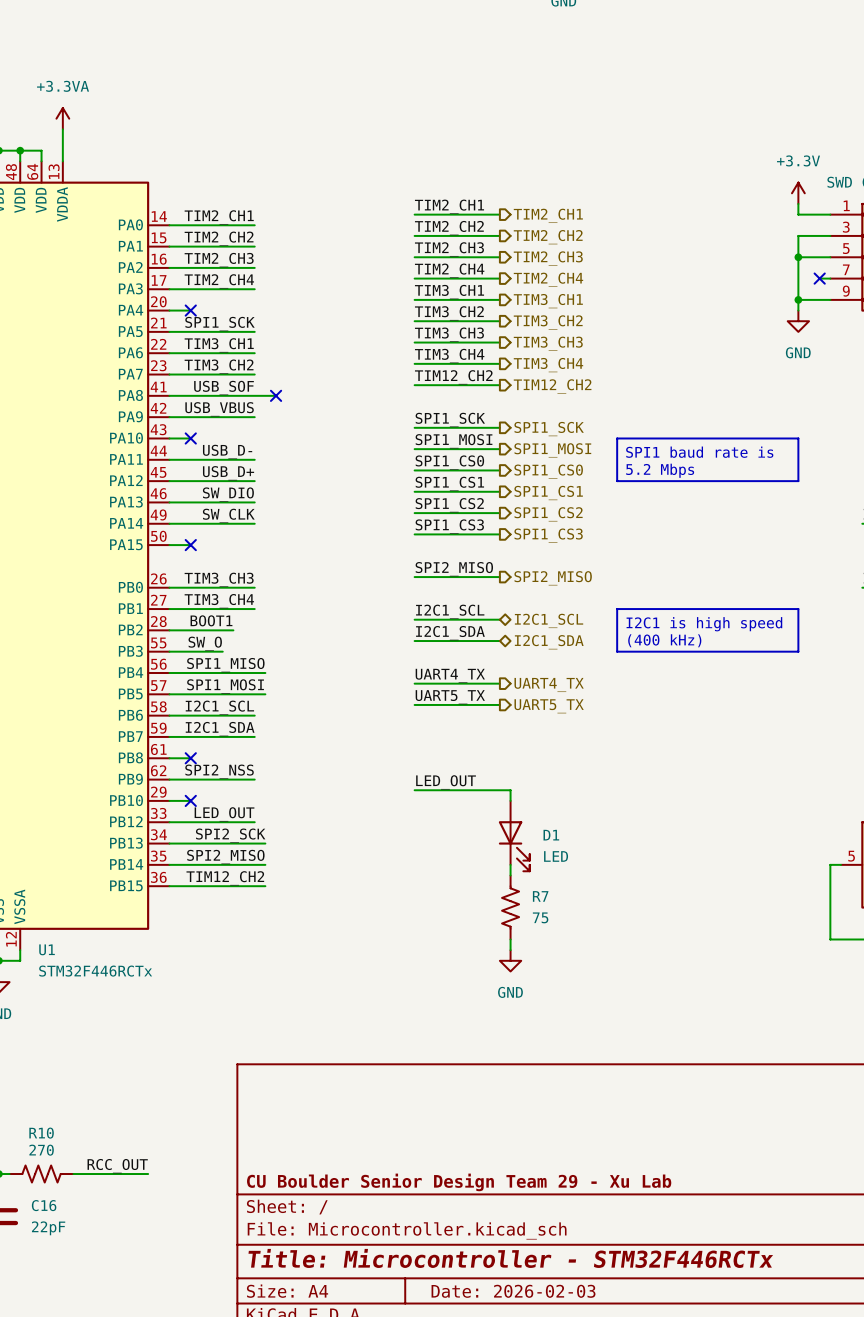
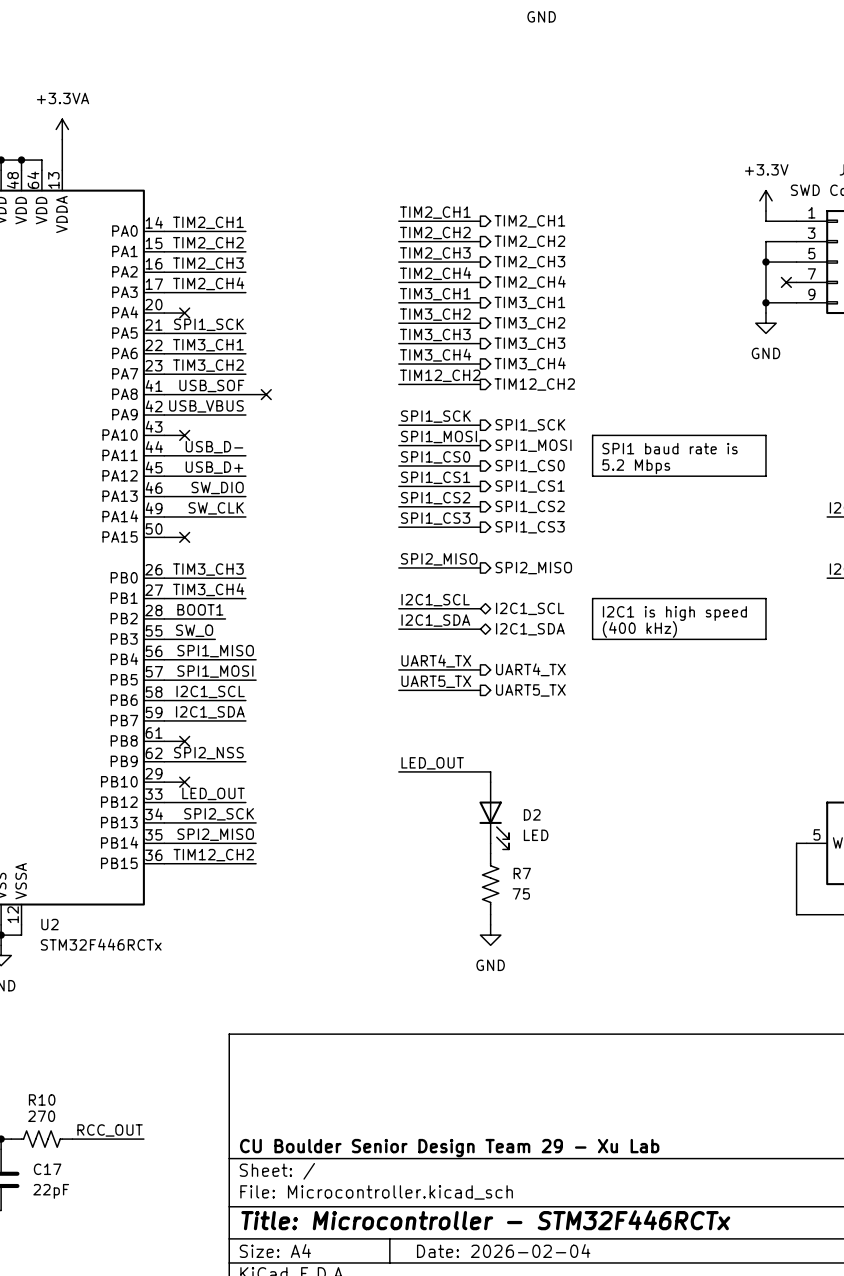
D1 name: D1 (551, 835) -> D2 (532, 814)
U1 name: U1 (47, 949) -> U2 (49, 924)
C16 name: C16 (44, 1205) -> C17 (47, 1169)
title block: Date: 2026-02-03 (513, 1291) -> Date: 2026-02-04 (503, 1251)

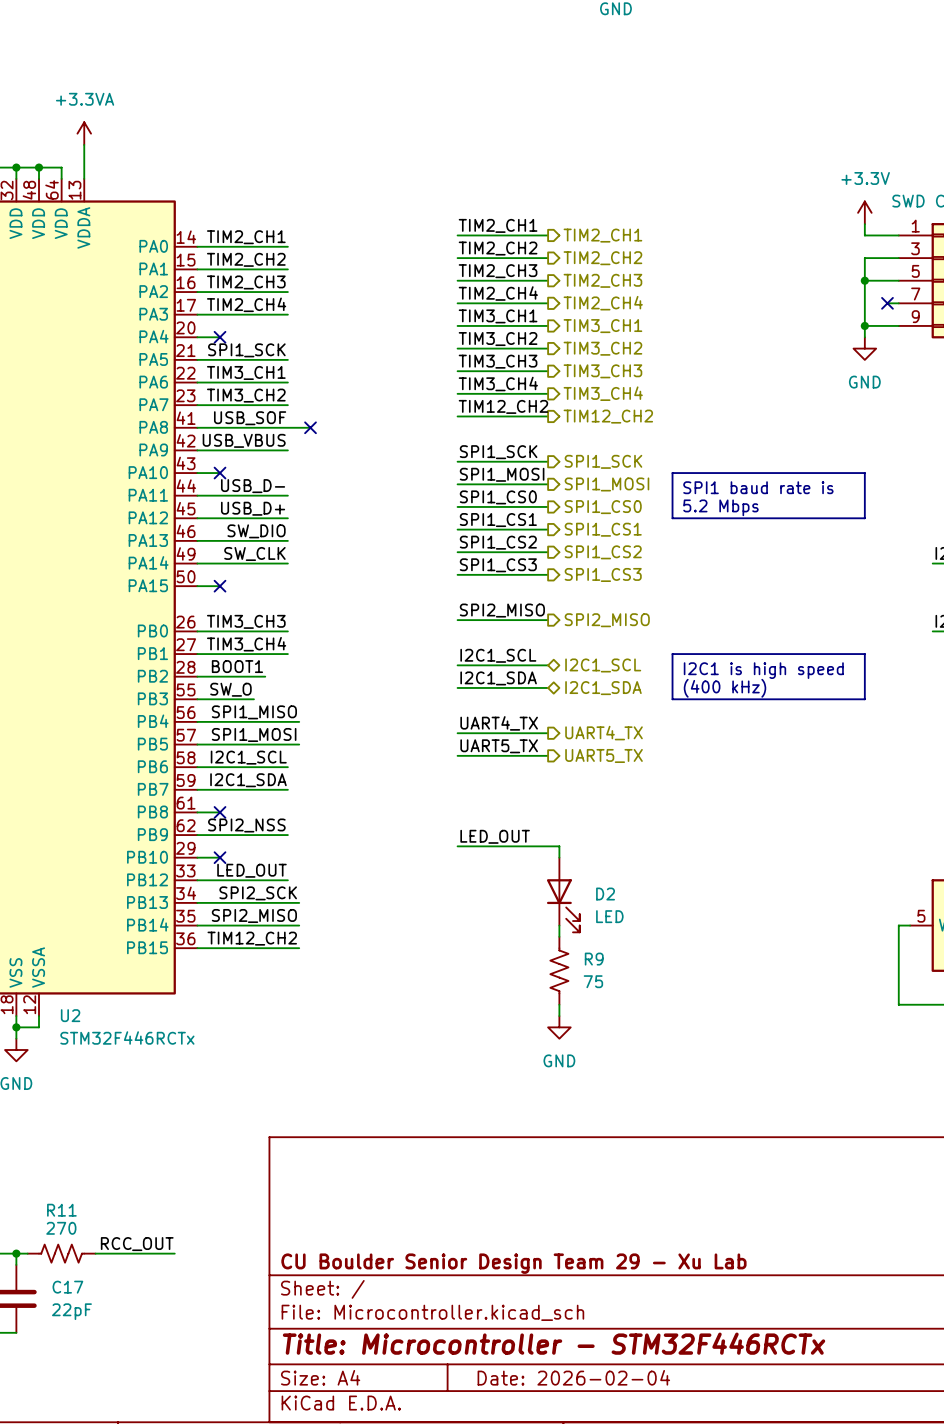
R7 name: R7 (522, 873) -> R9 (594, 959)
R10 name: R10 (42, 1099) -> R11 (61, 1210)

